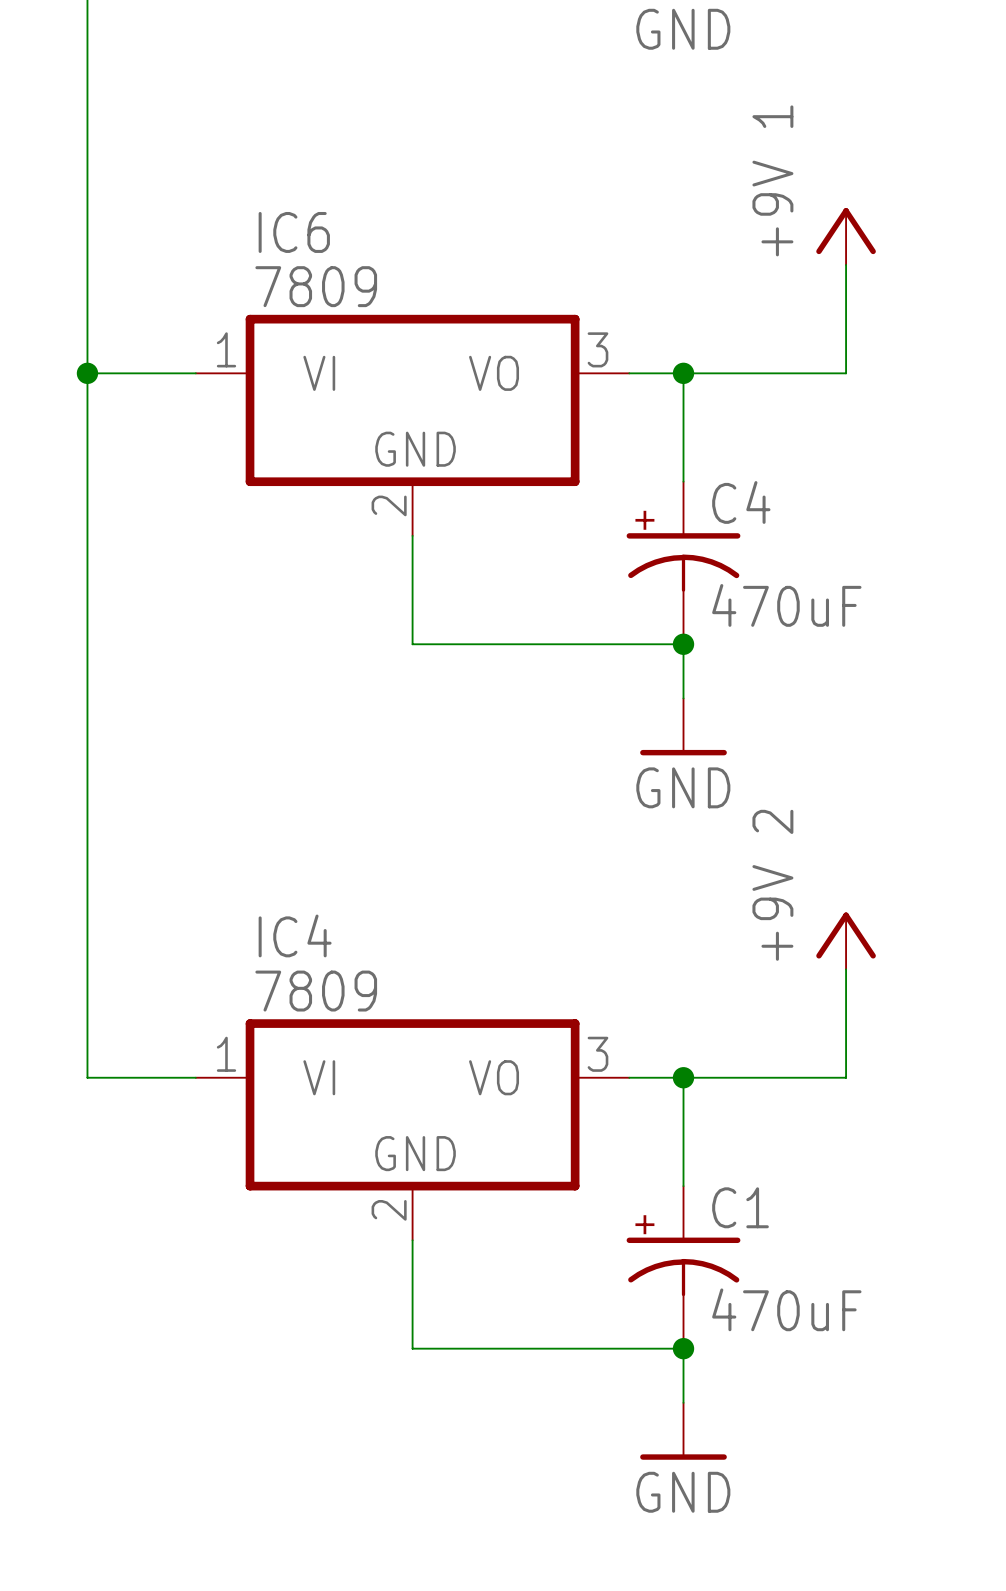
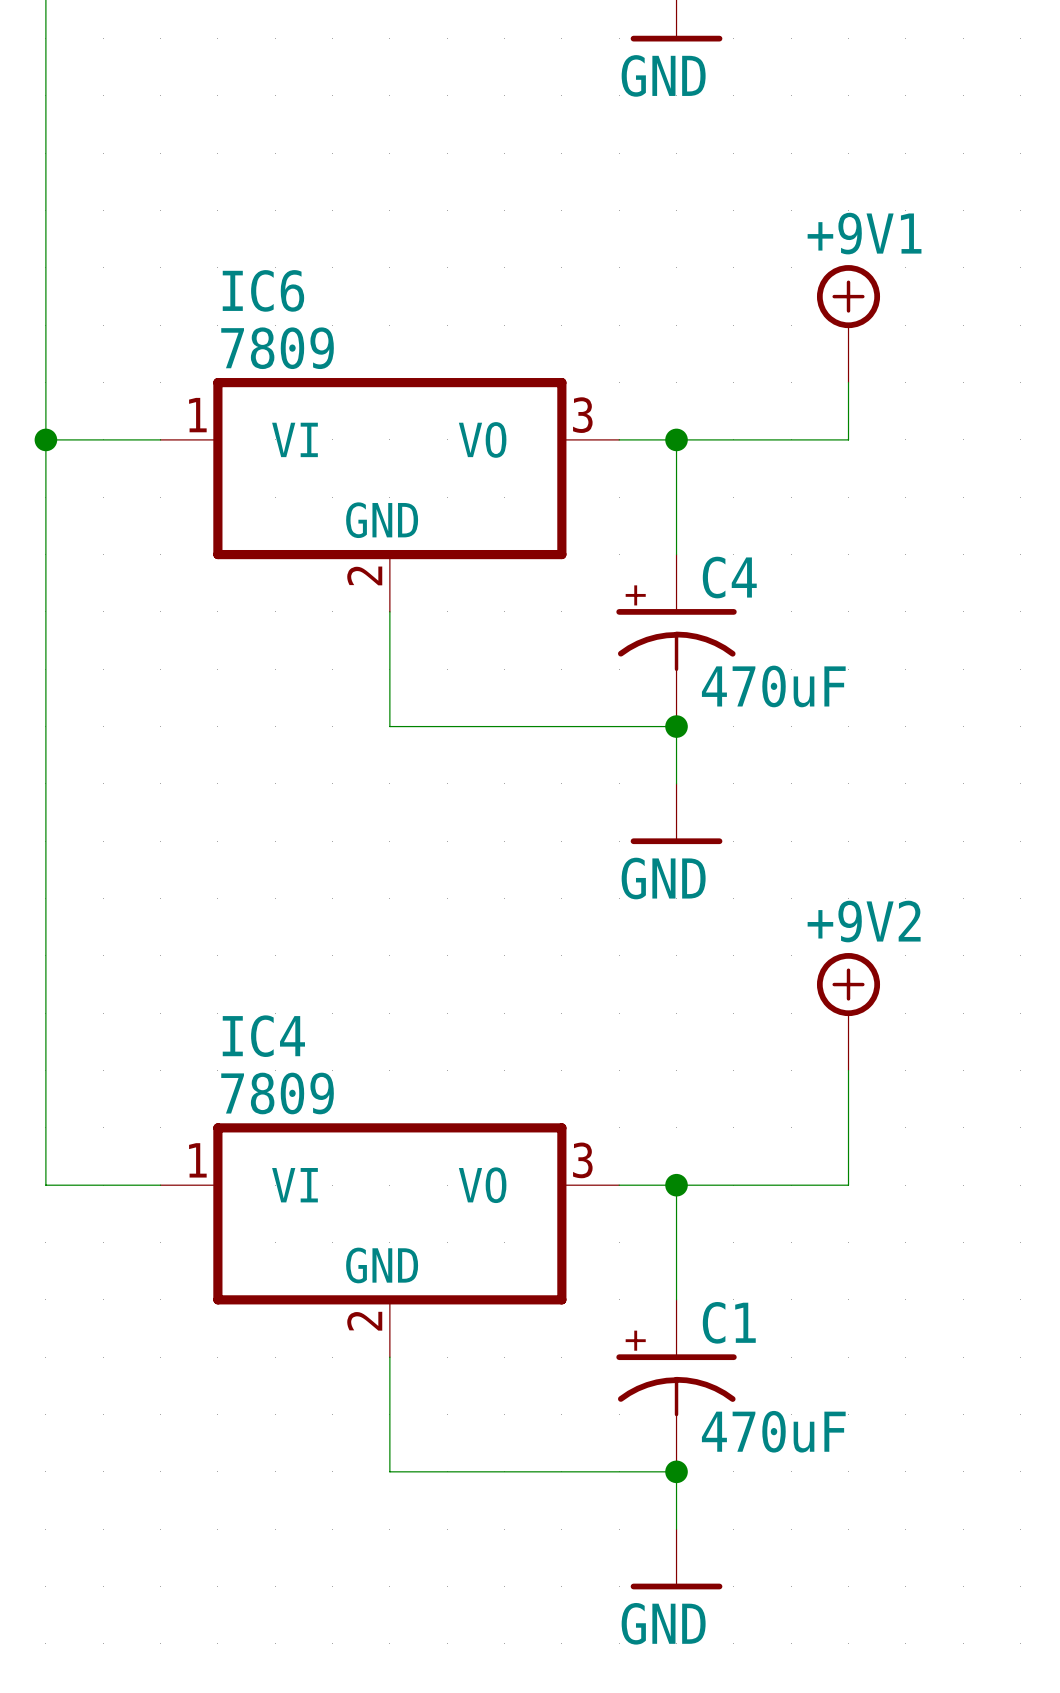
power symbol: +9V 1 (846, 236) -> none
power symbol: none -> +9V1 (848, 323)
power symbol: none -> +9V2 (848, 1011)
power symbol: +9V 2 (846, 940) -> none

